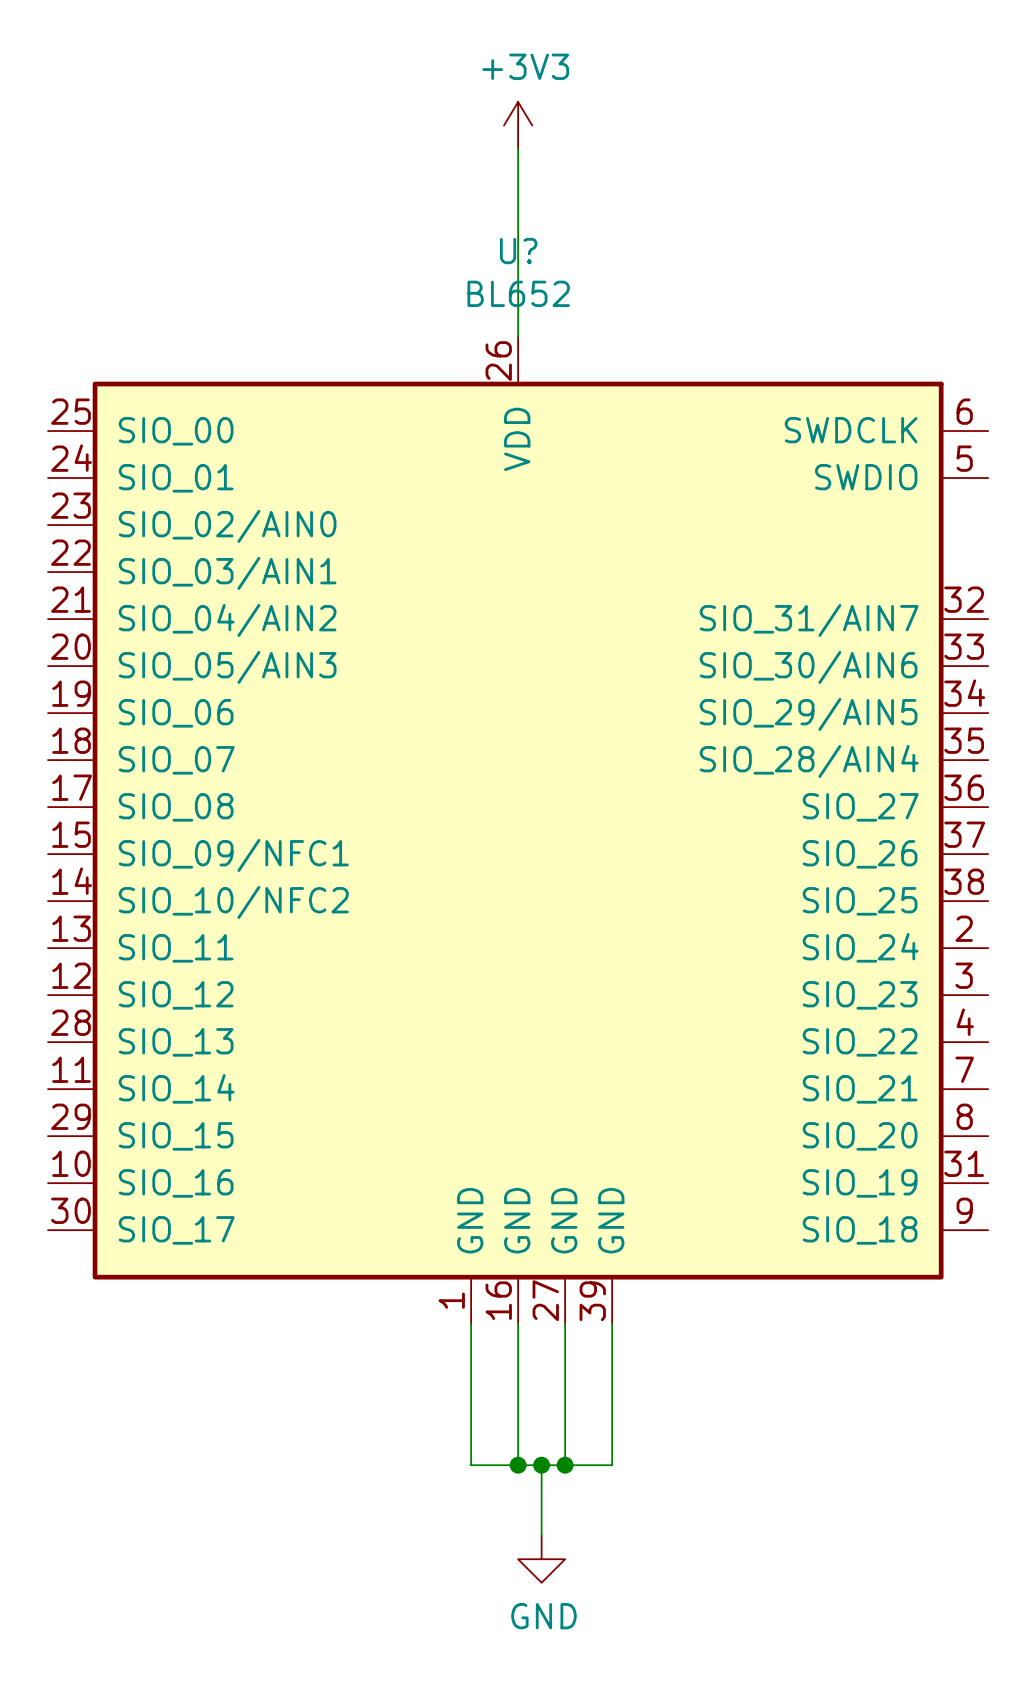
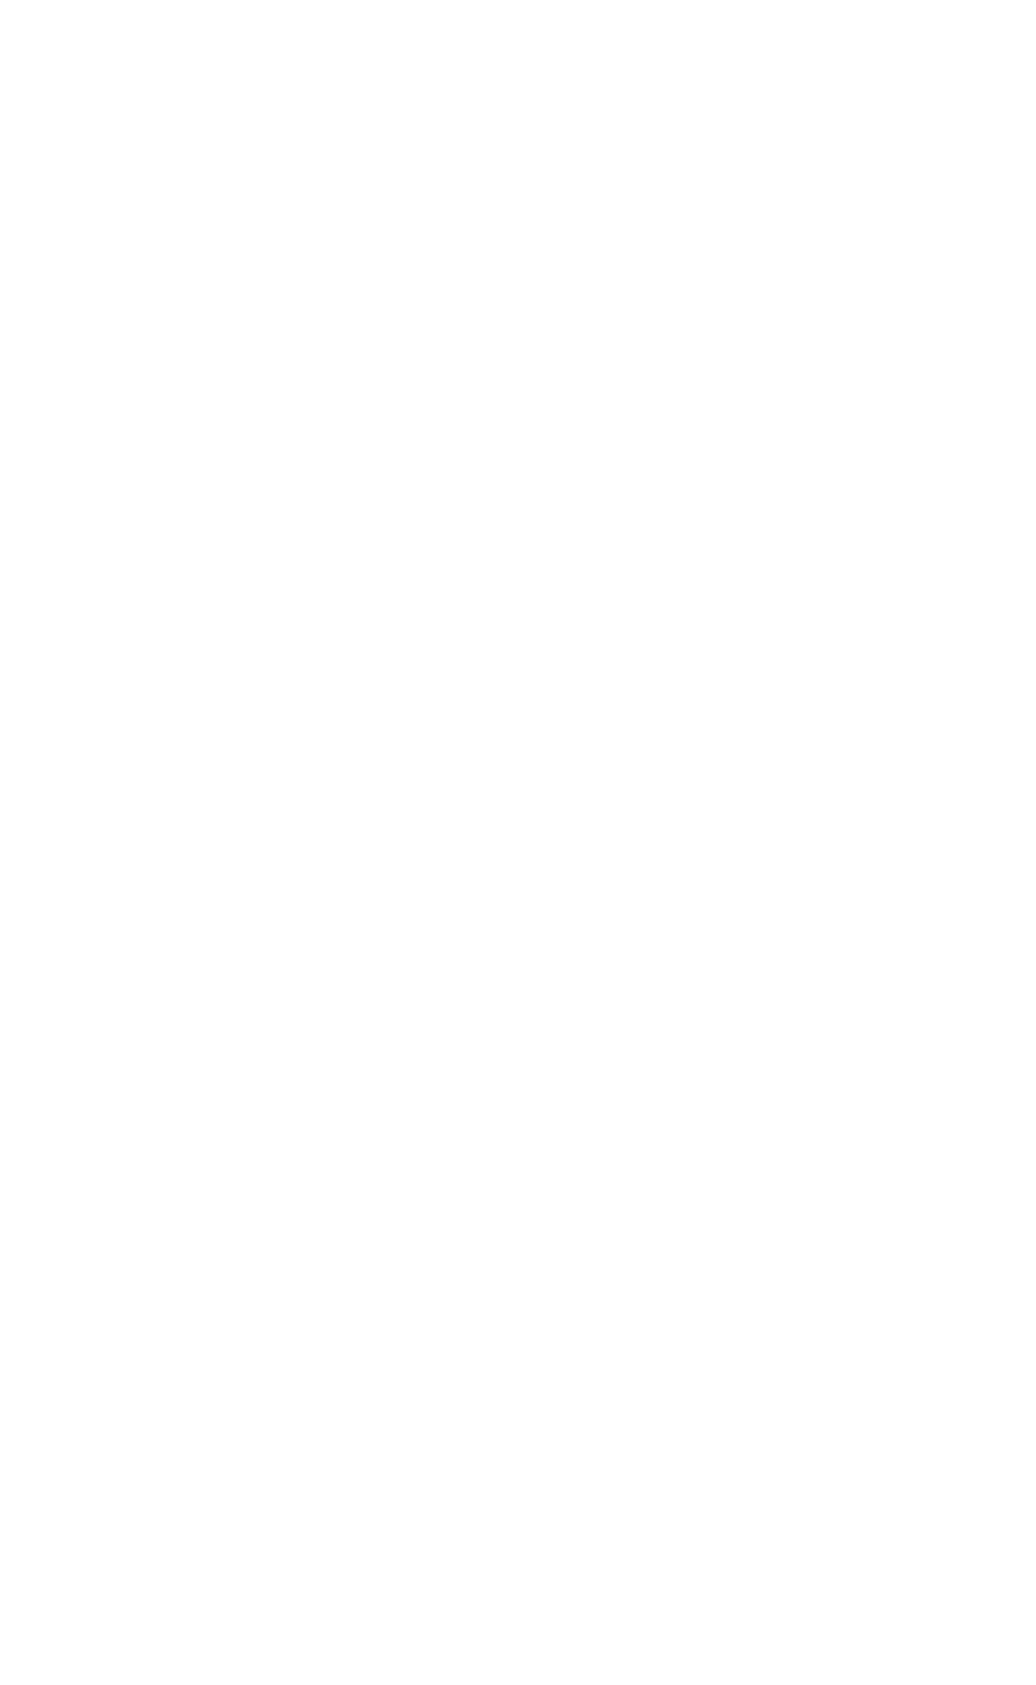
power symbol: +3V3 (518, 125) -> none
wire: (518, 148) (518, 337) -> none
U?: BL652 (518, 830) -> none
wire: (471, 1324) (471, 1465) (612, 1465) (612, 1324) -> none
wire: (518, 1324) (518, 1465) -> none
wire: (565, 1324) (565, 1465) -> none
junction: (518, 1465) -> none
wire: (541, 1465) (541, 1535) -> none
junction: (541, 1465) -> none
junction: (565, 1465) -> none
power symbol: GND (541, 1559) -> none

